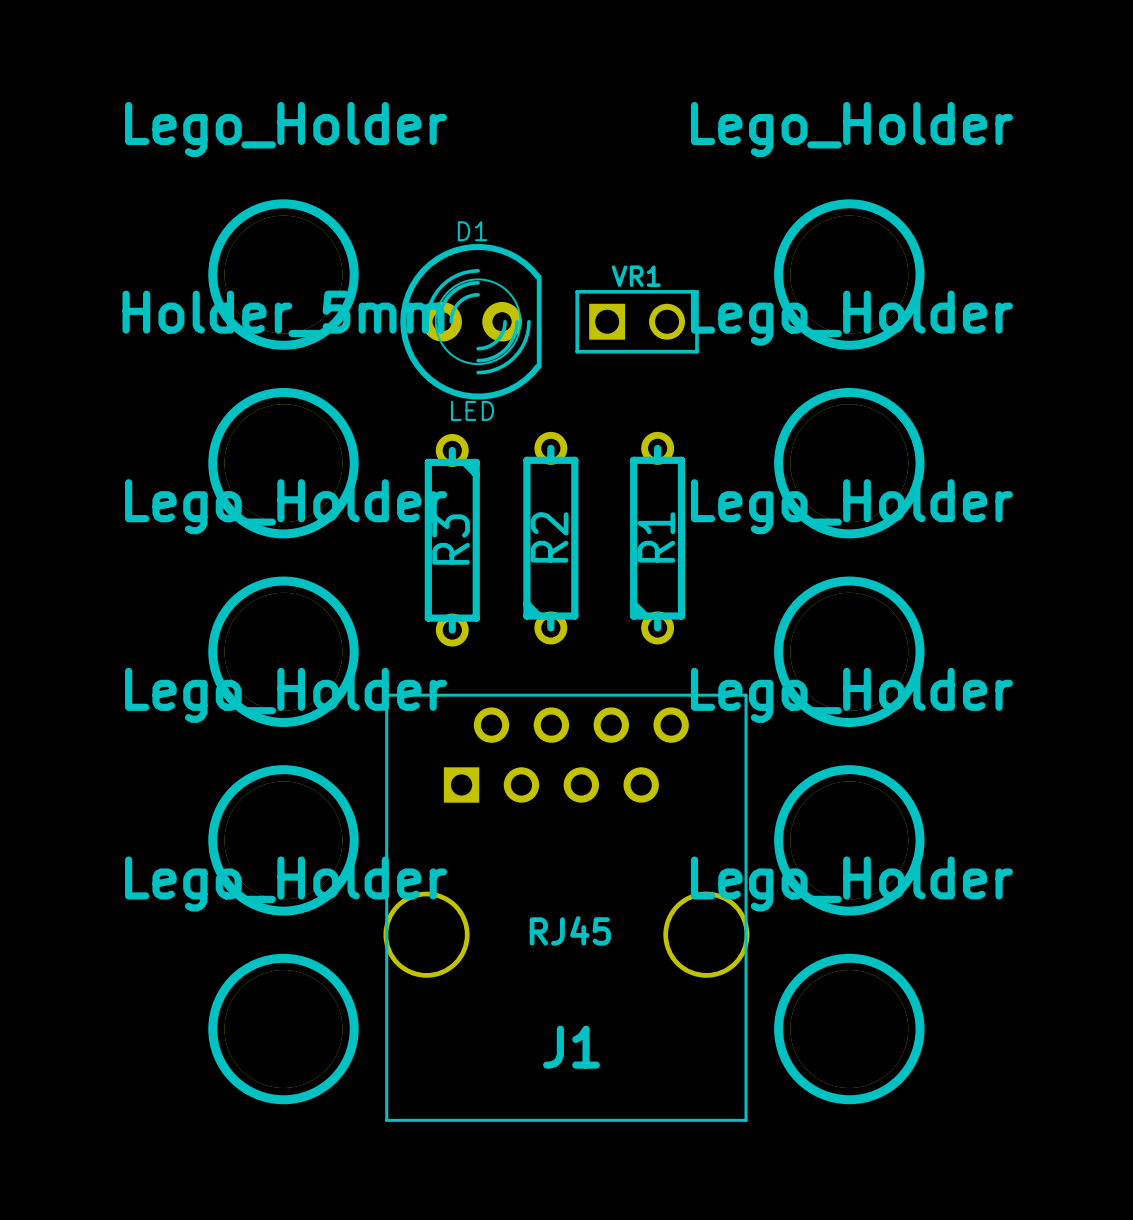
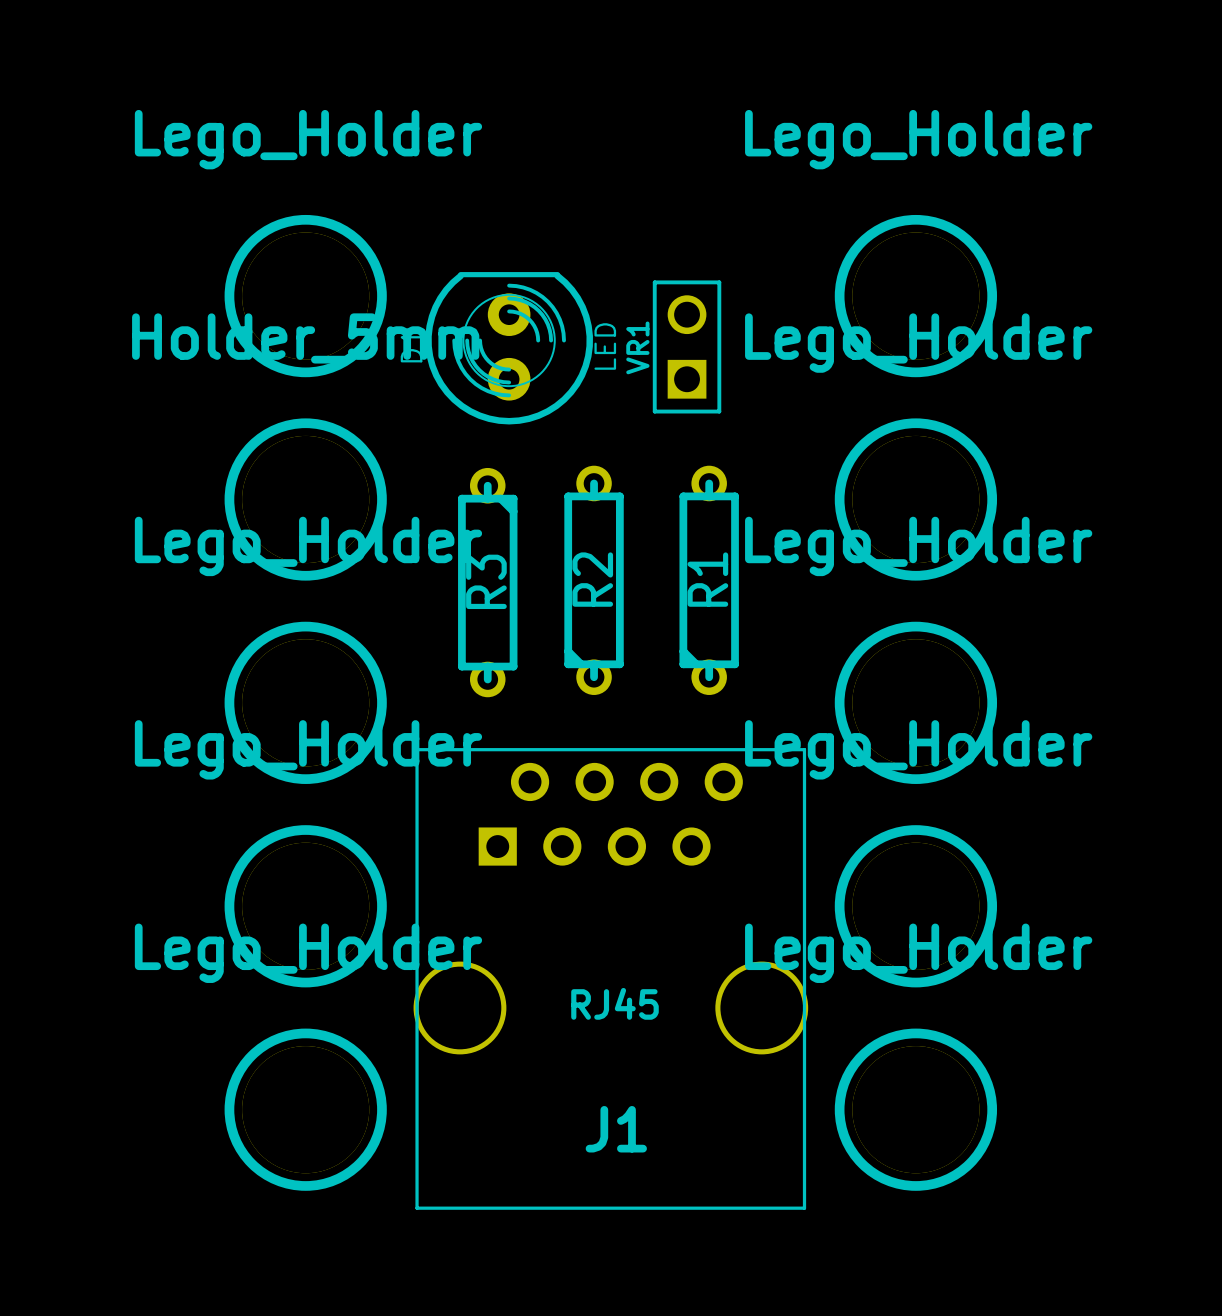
D1 rotation: 0° (470, 321) -> 90° counterclockwise (509, 348)
VR1 rotation: 0° (637, 321) -> 90° counterclockwise (687, 346)

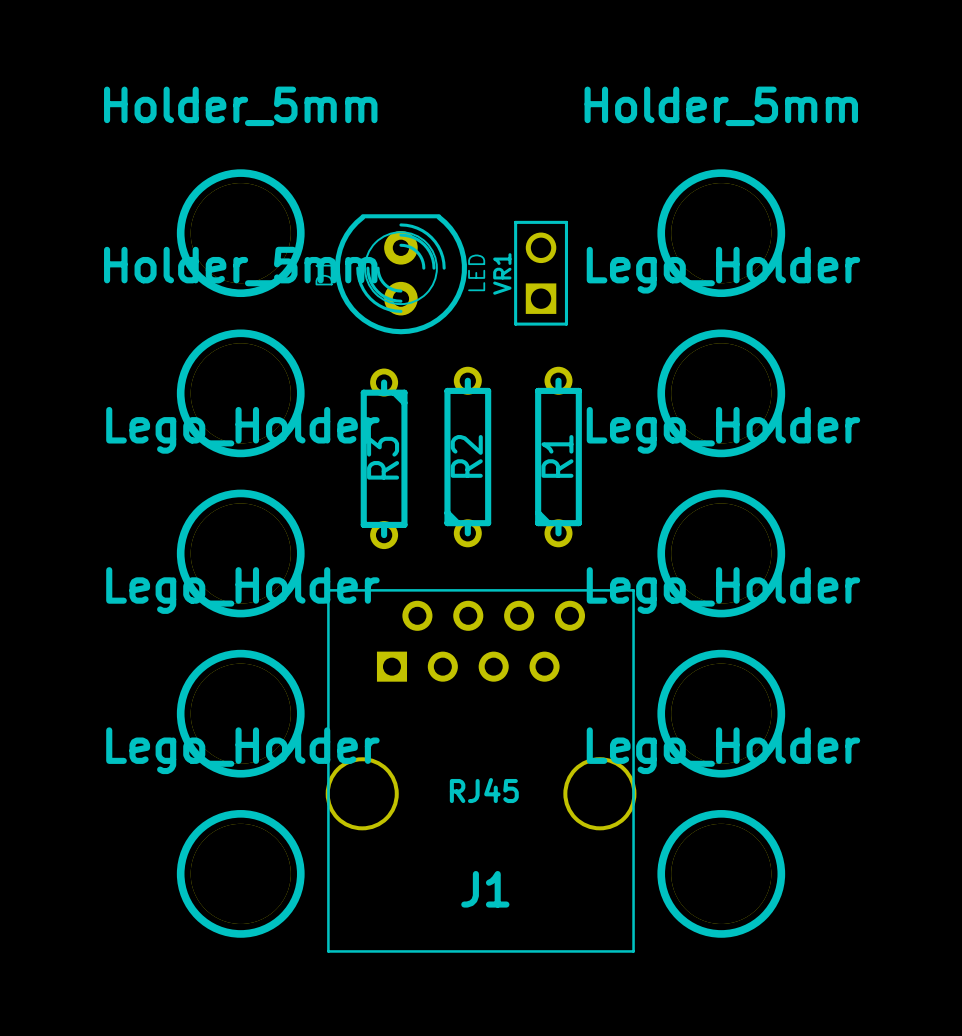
Lego_Holder name: Lego_Holder (308, 139) -> Holder_5mm (240, 106)
Lego_Holder name: Lego_Holder (918, 139) -> Holder_5mm (721, 106)

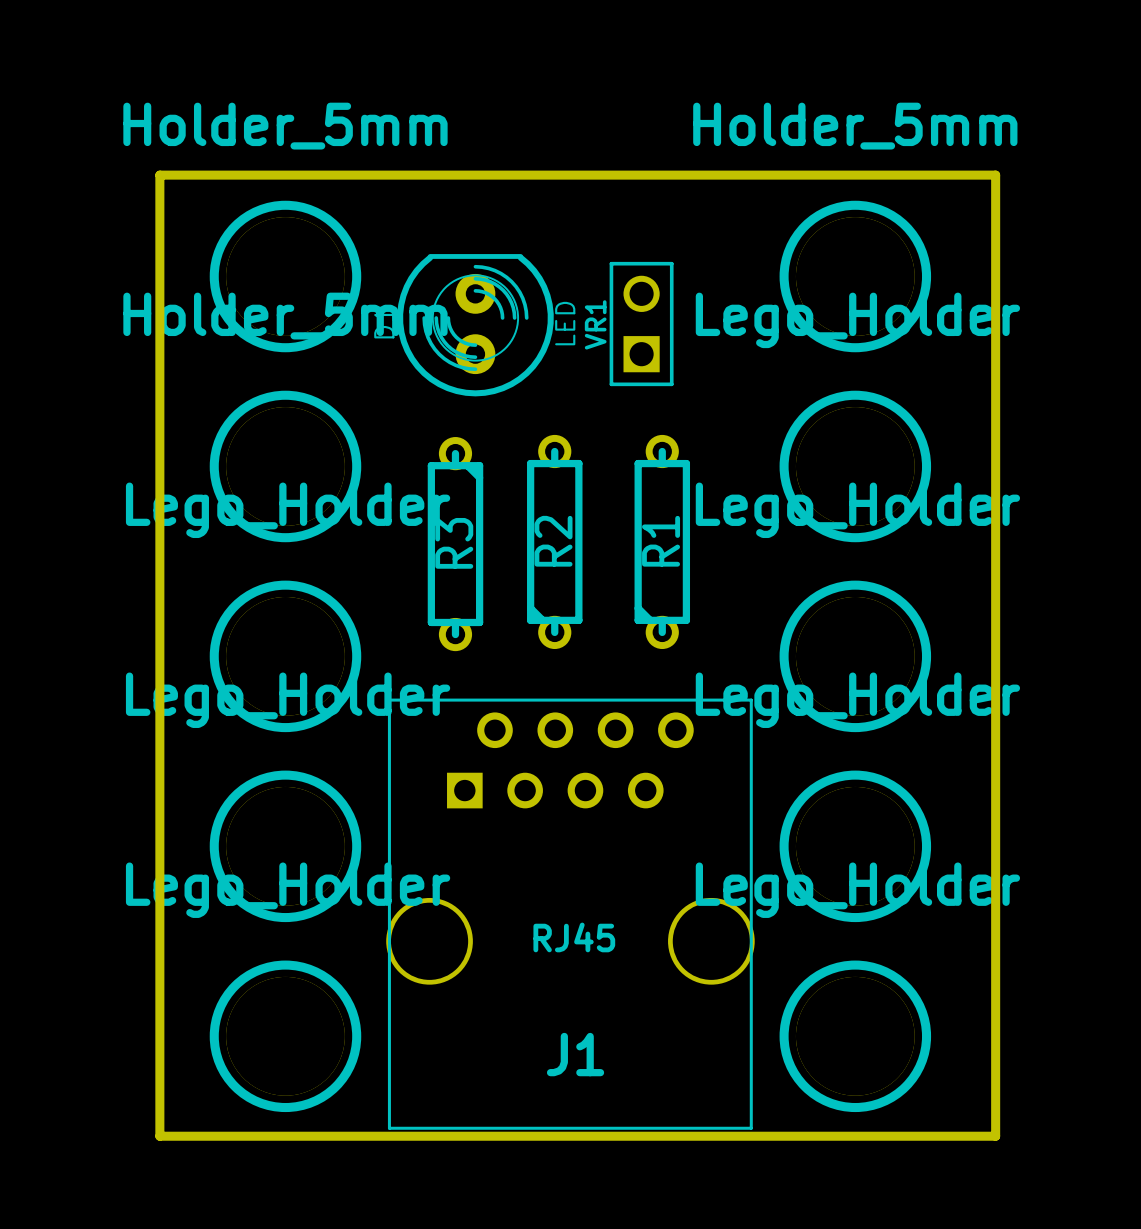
board edge: none -> (159, 175) (159, 1136) (995, 1136) (995, 175) (159, 175)

